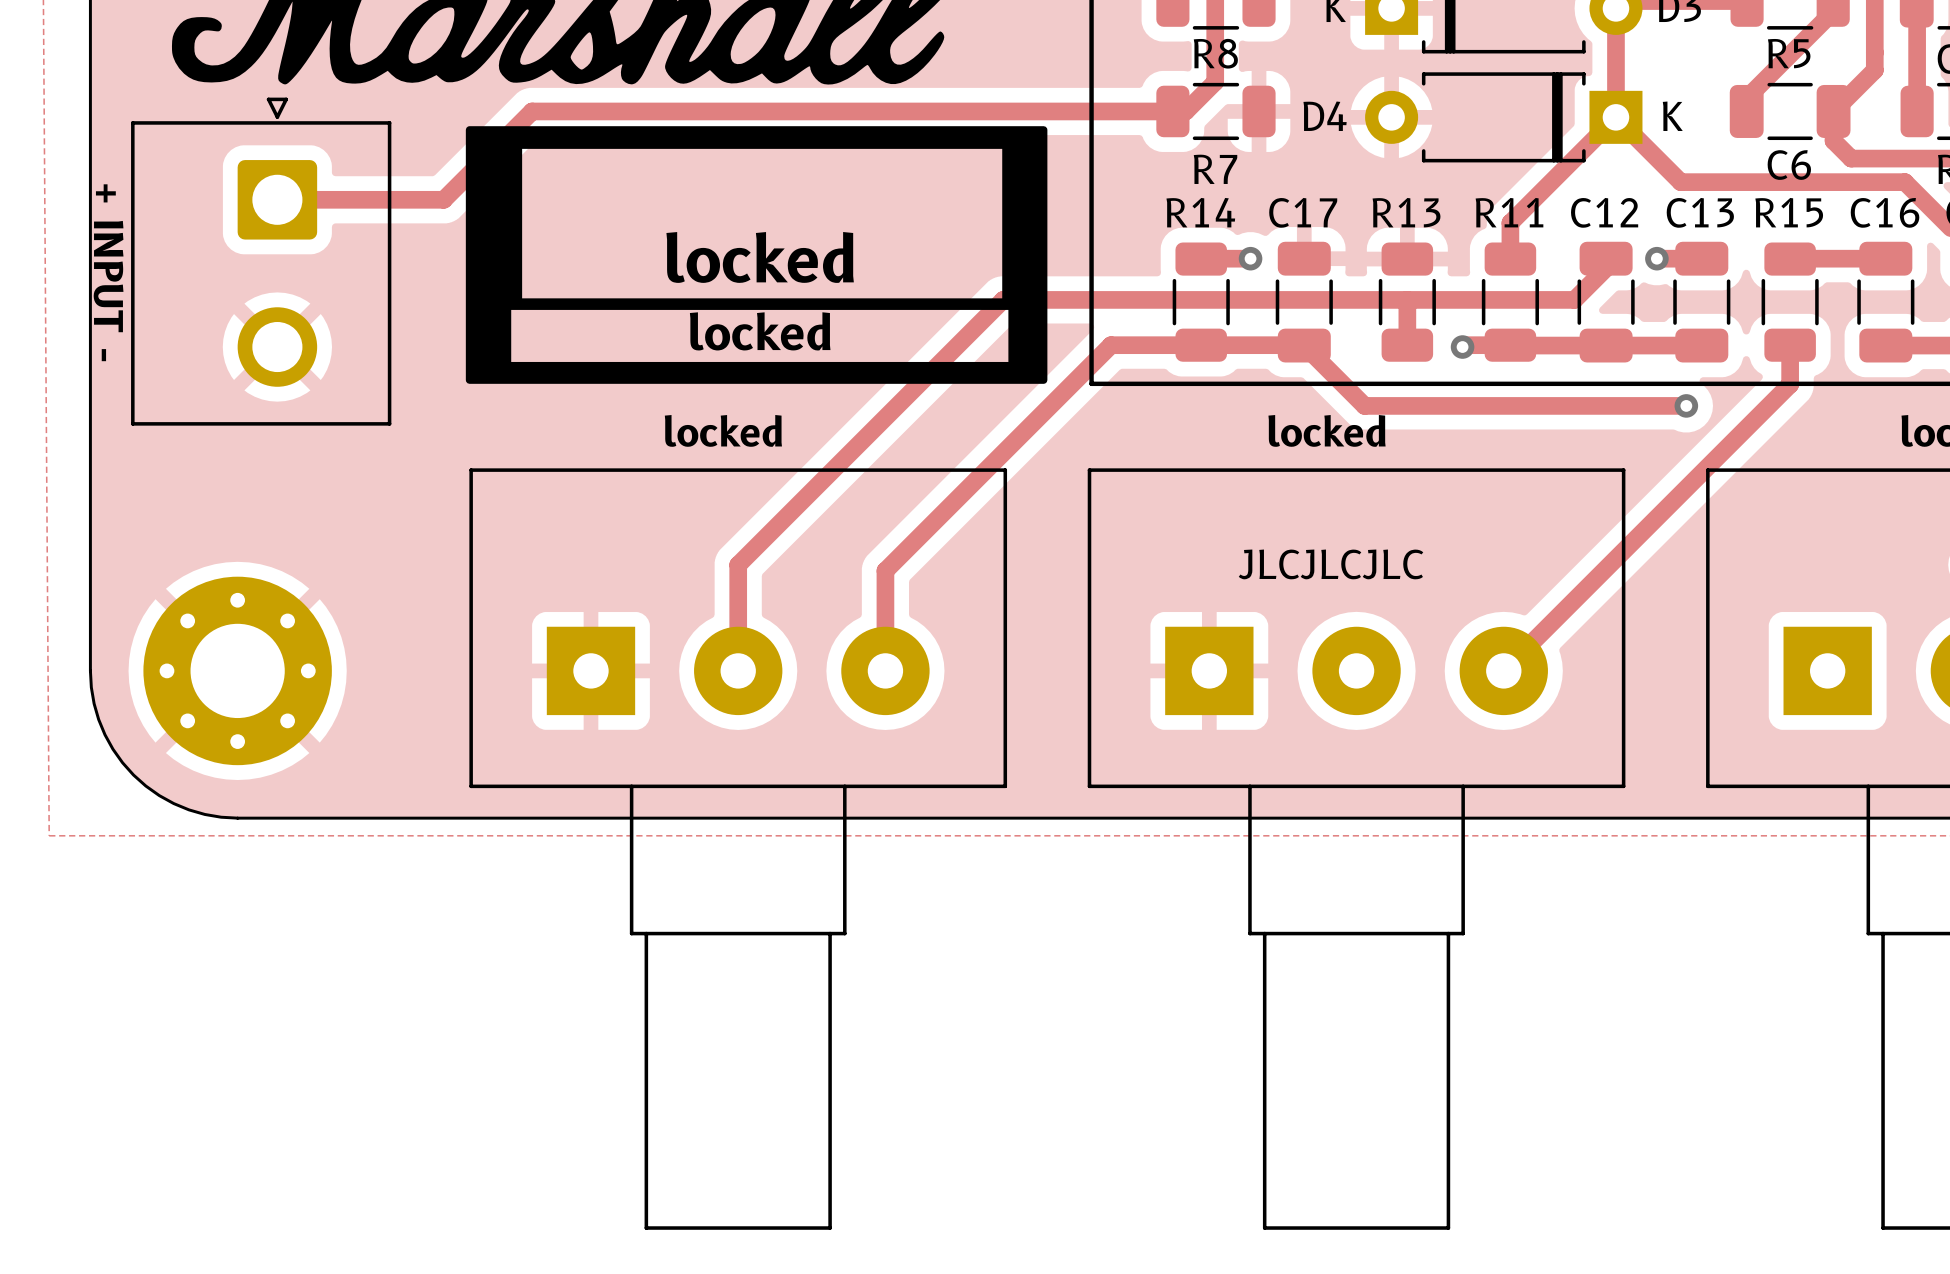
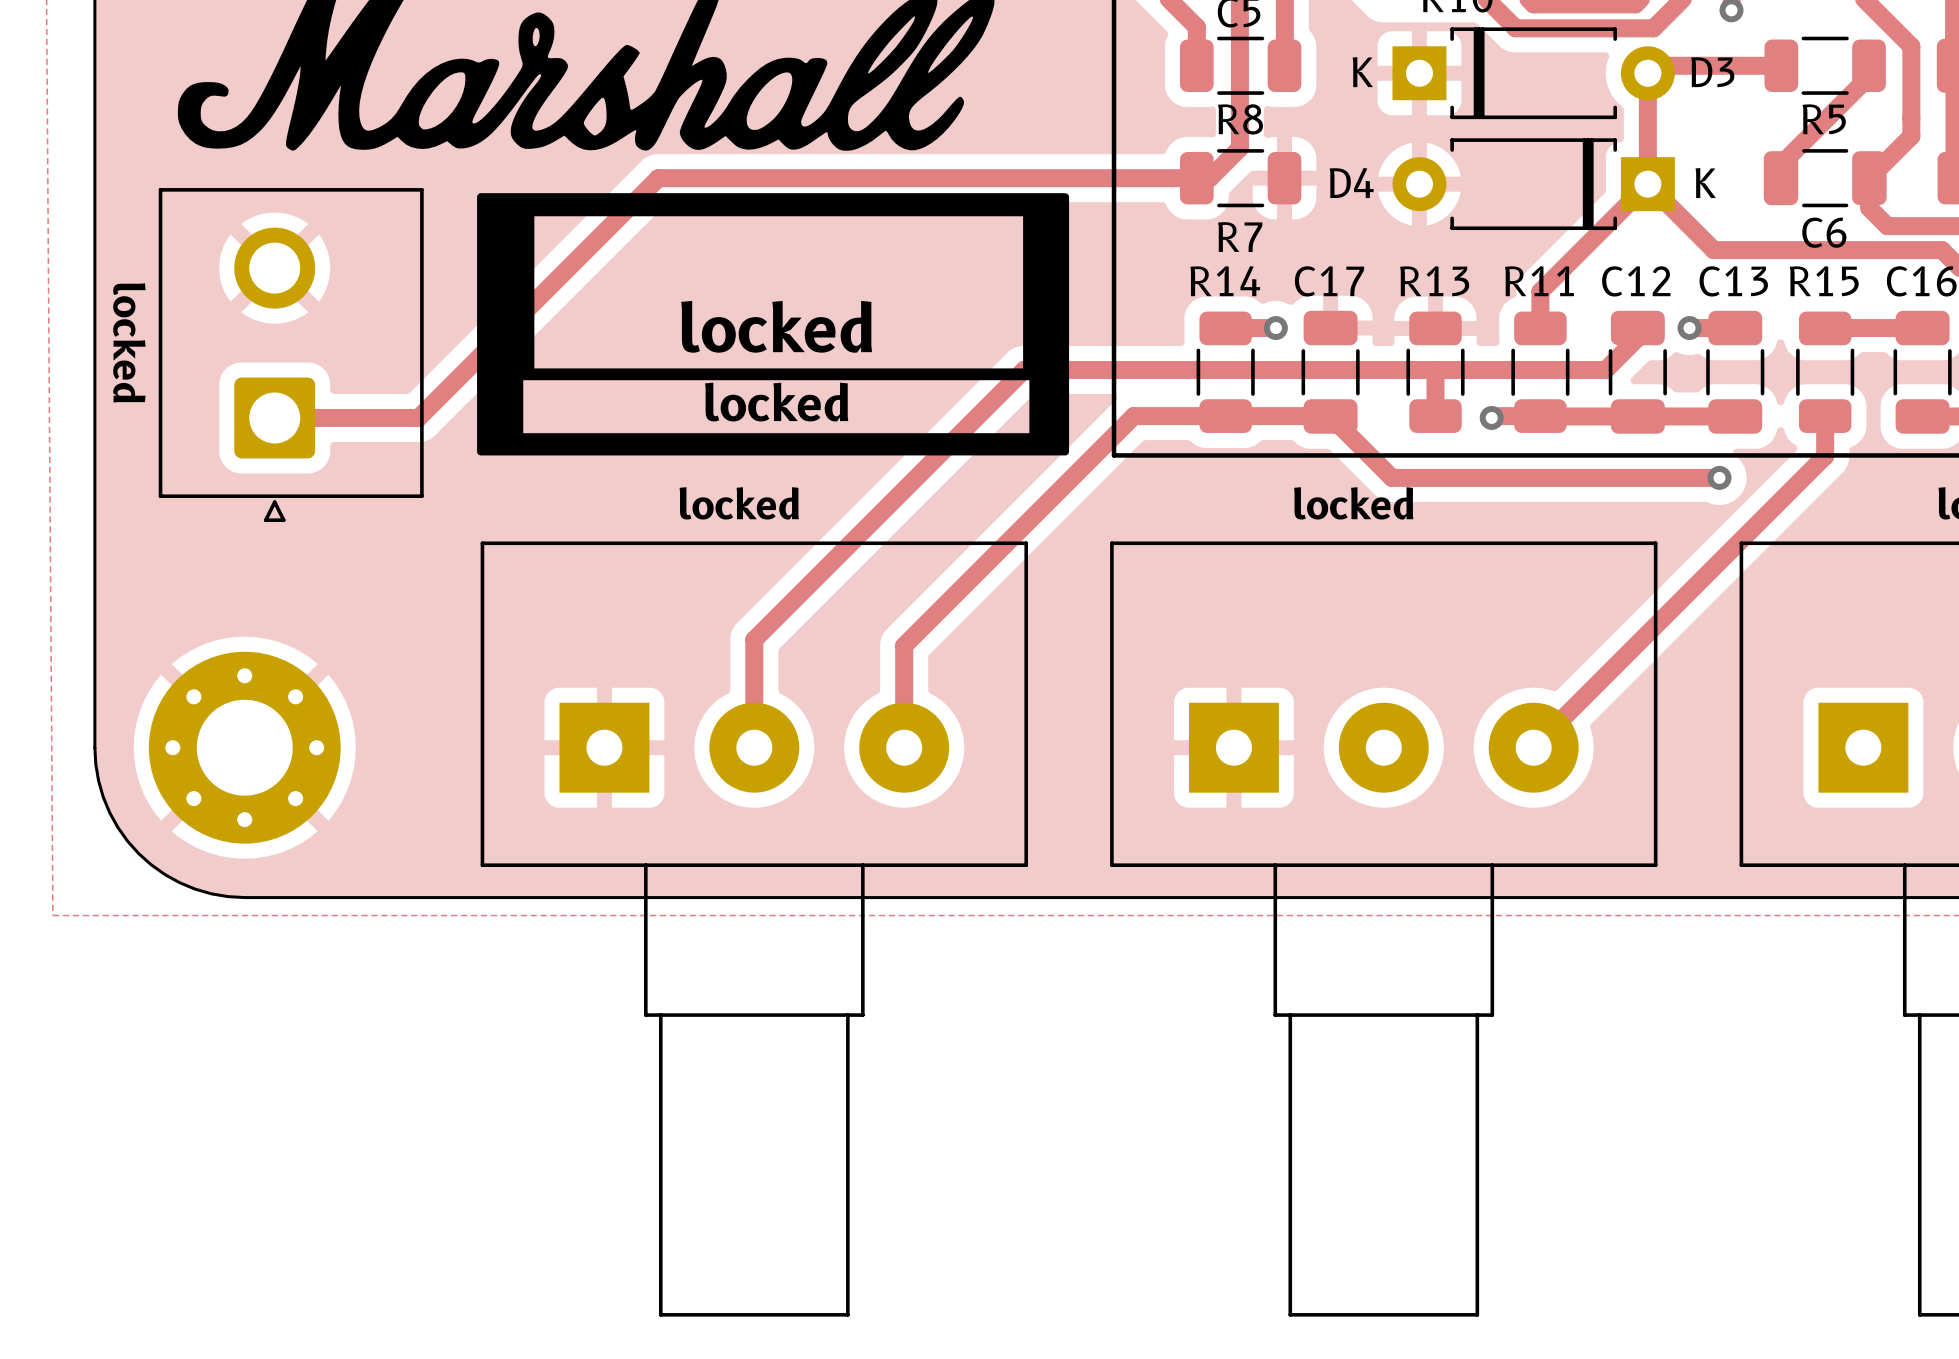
track: (643, 111) (532, 111) (443, 199) (267, 199) -> (658, 178) (418, 417) (274, 417)
part rotation: 0° (261, 261) -> 180° (291, 355)
text: + INPUT - (108, 272) -> locked (129, 342)
text: JLCJLCJLC (1331, 564) -> none

